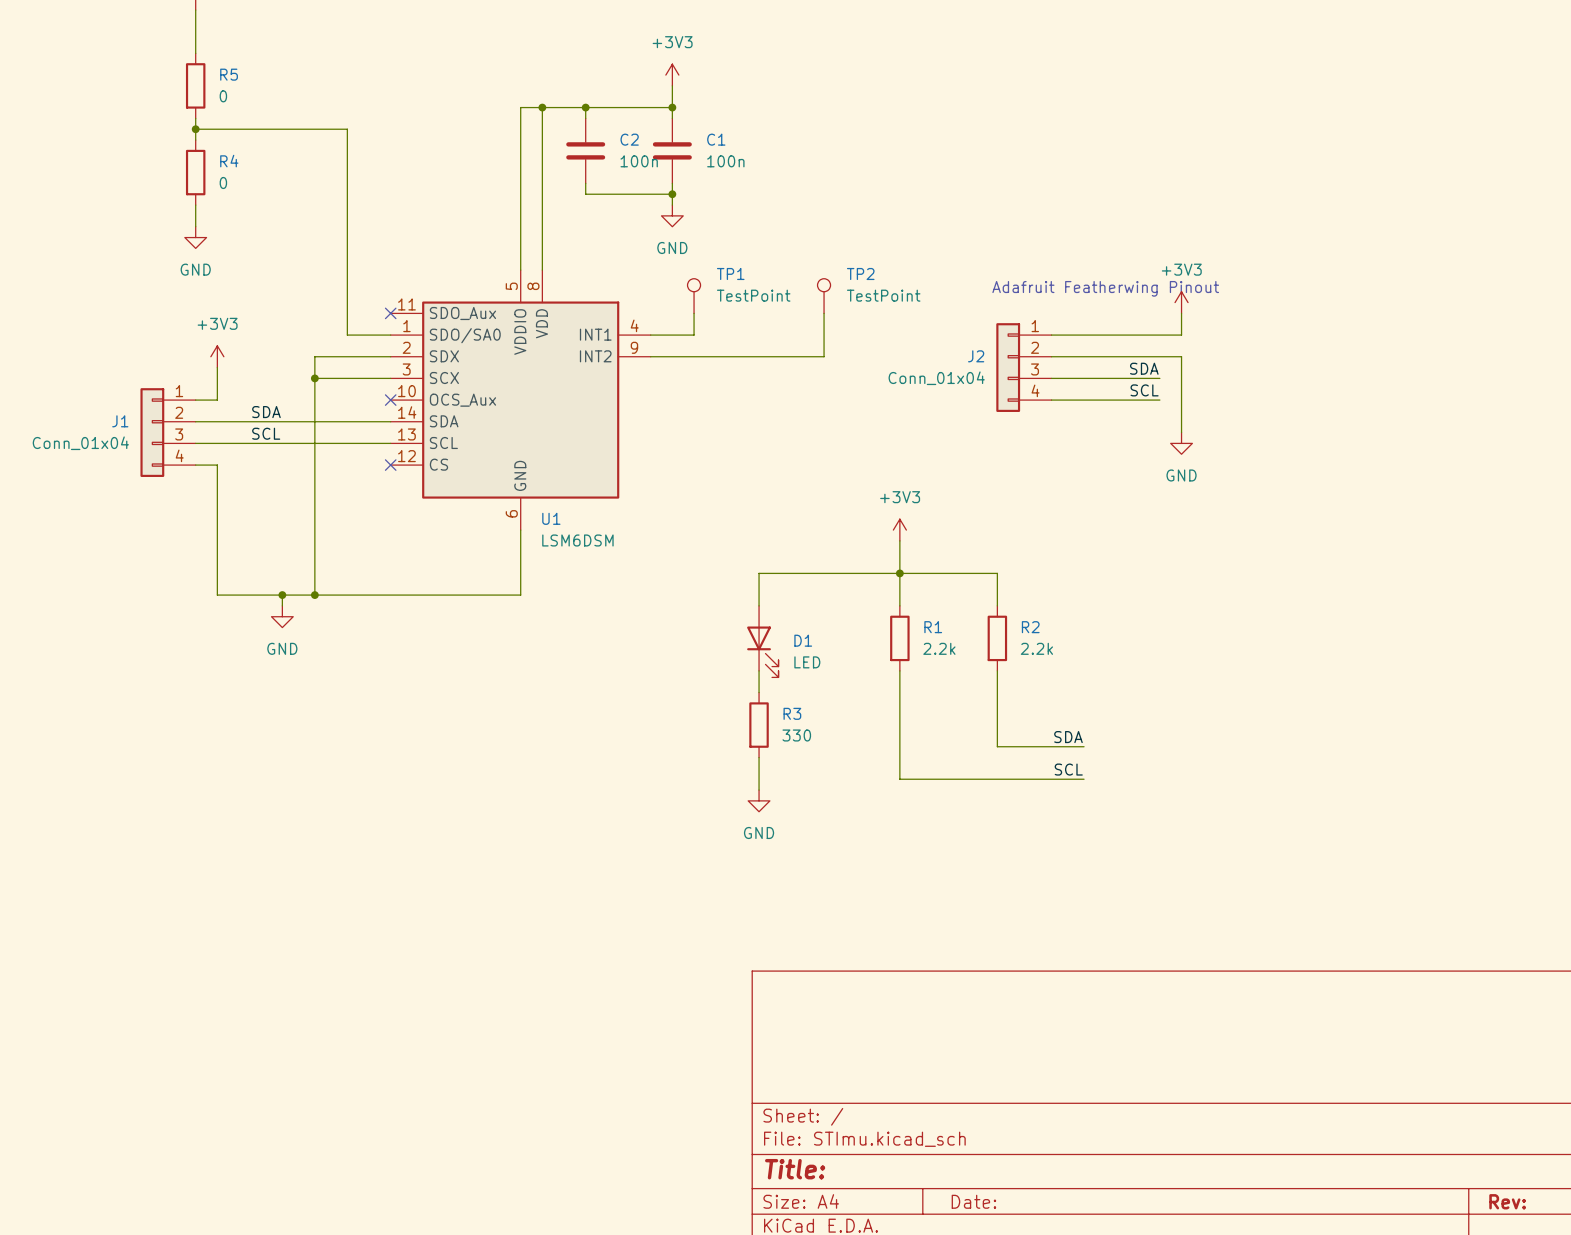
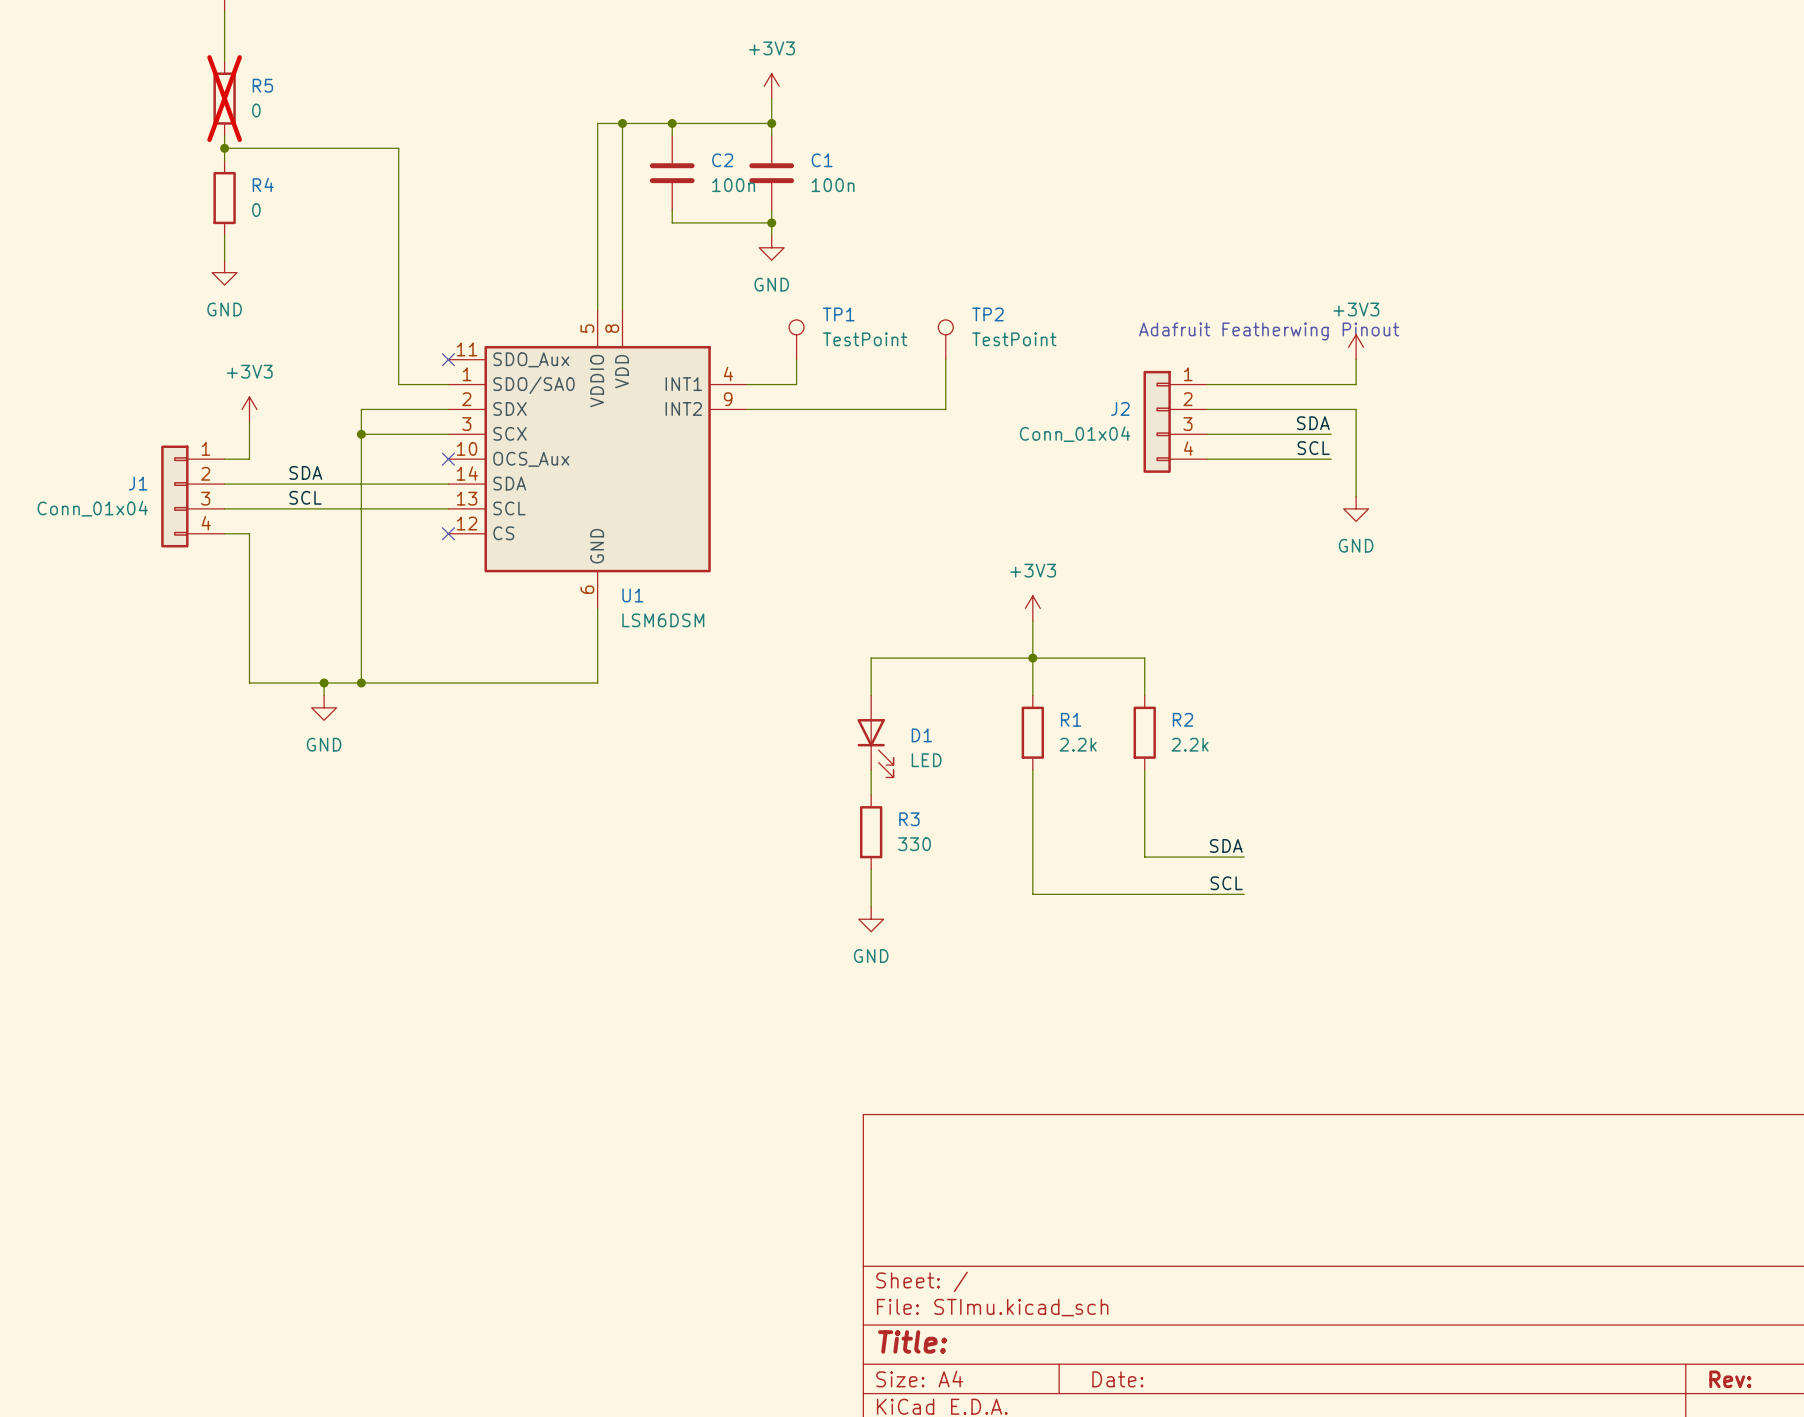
R5 do-not-place cross: none -> (224, 98)

